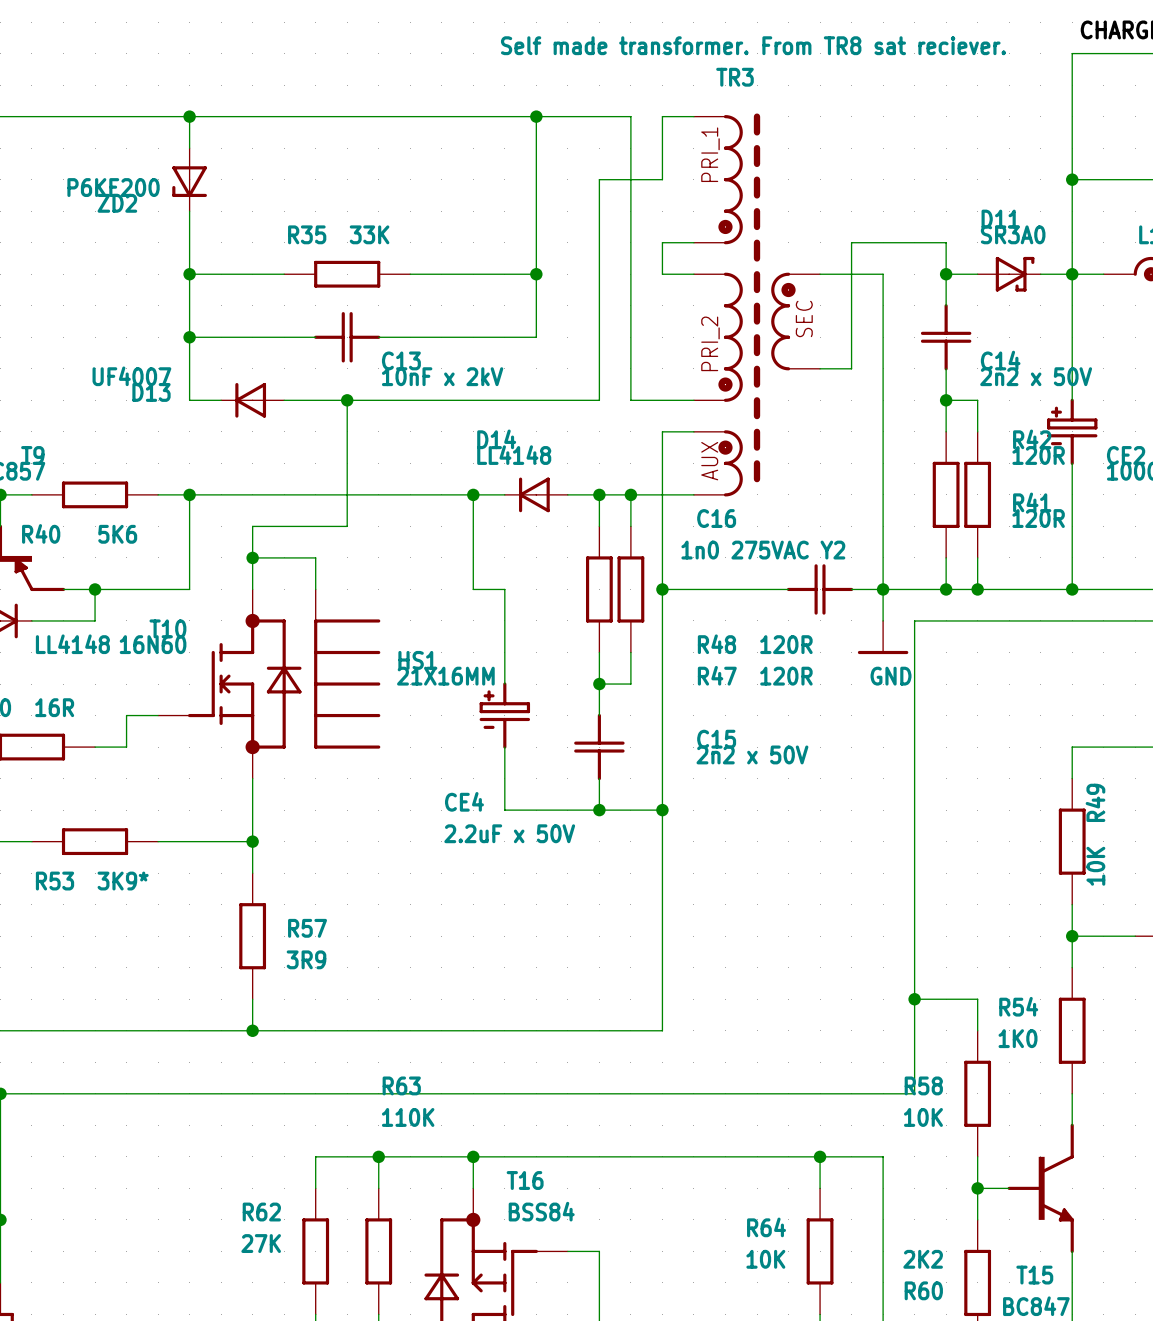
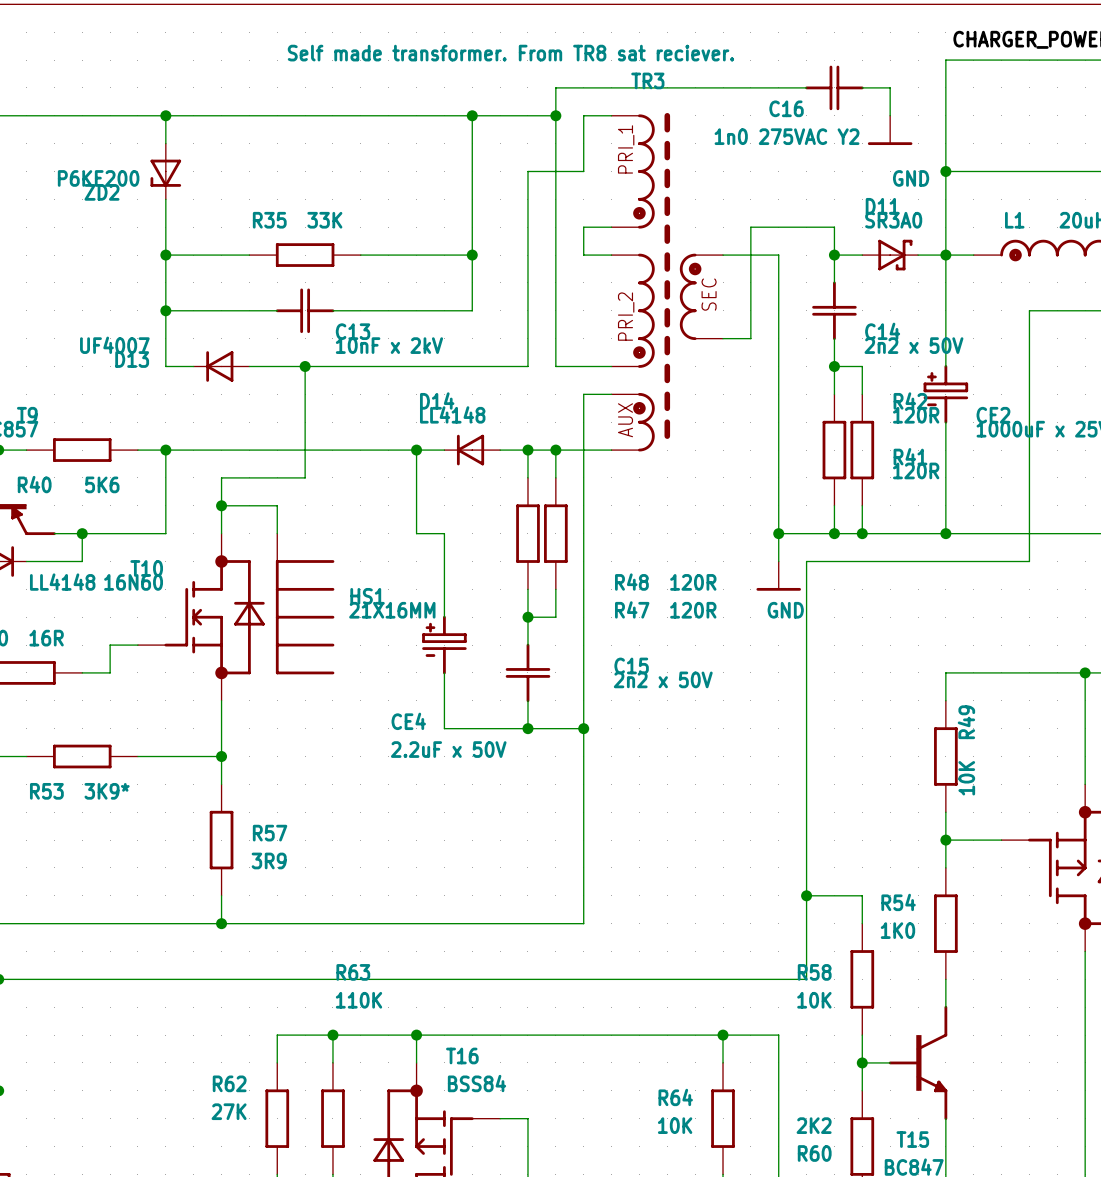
TR3 value position: Self made transformer. From TR8 sat reciever. (753, 45) -> Self made transformer. From TR8 sat reciever. (510, 53)
wire: none -> (806, 87) (555, 87) (555, 115)
wire: none -> (862, 87) (890, 87) (890, 115)
junction: none -> (555, 115)
power symbol: none -> GND (890, 130)
C16 name position: C16 (716, 518) -> C16 (786, 108)
C16 value position: 1n0 275VAC Y2 (763, 550) -> 1n0 275VAC Y2 (787, 136)
wire: (662, 589) (788, 589) -> none
junction: (662, 589) -> none
C16 position: (820, 589) -> (834, 87)
wire: (851, 589) (883, 589) -> none

